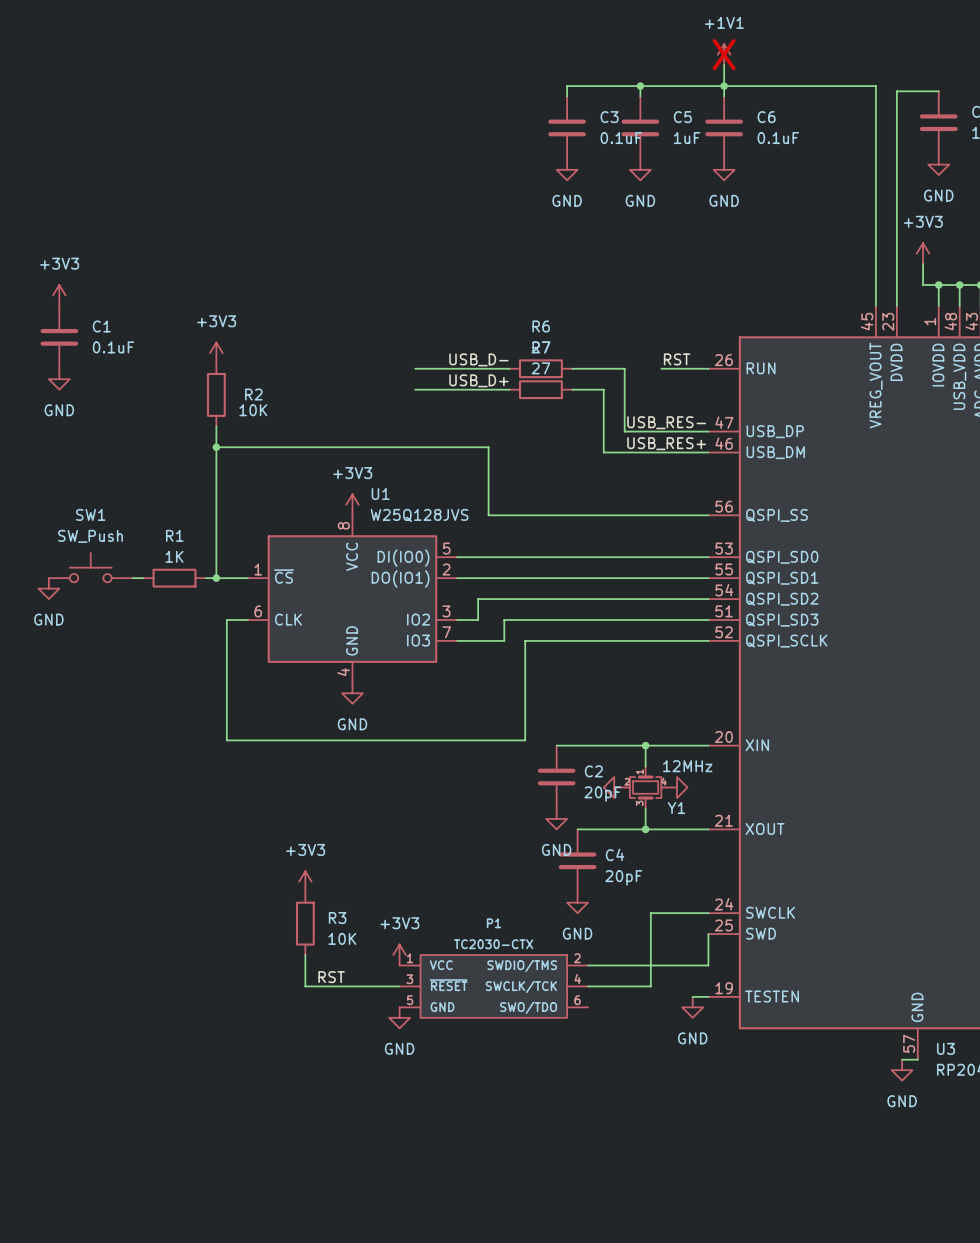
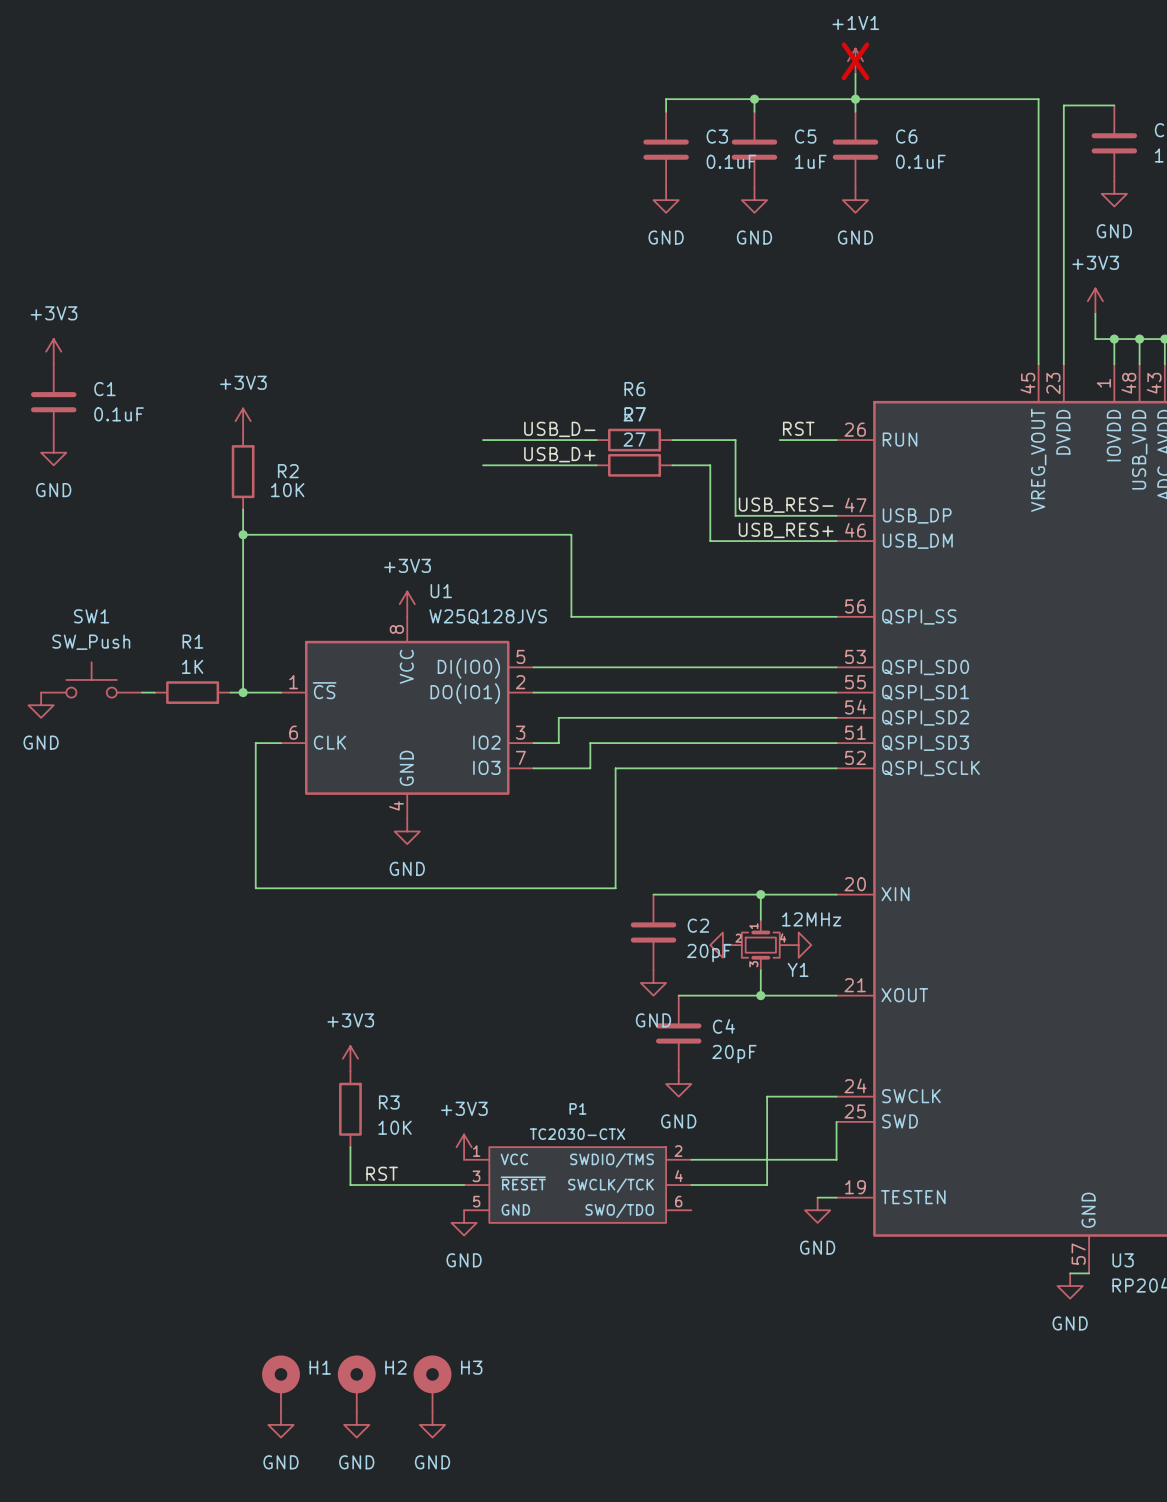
H1: none -> (281, 1383)
H2: none -> (356, 1383)
H3: none -> (432, 1383)
power symbol: none -> GND (281, 1424)
power symbol: none -> GND (356, 1424)
power symbol: none -> GND (432, 1424)

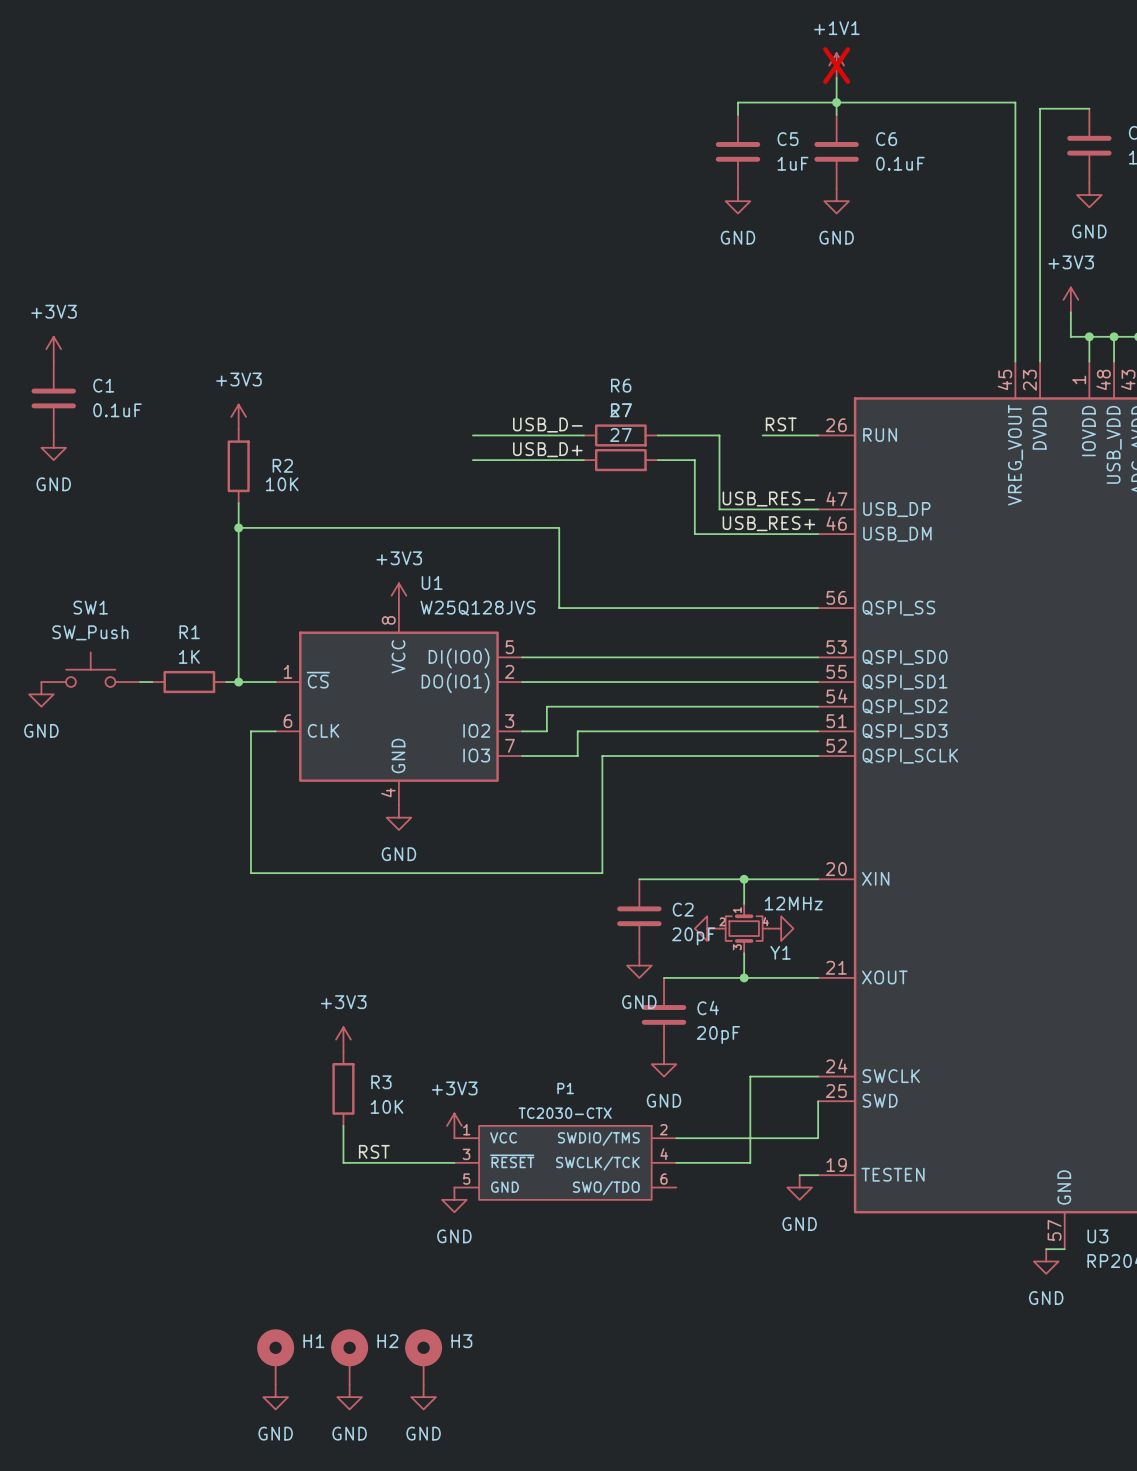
wire: (754, 99) (666, 99) (666, 111) -> none
junction: (754, 99) -> none
C3: 0.1uF (666, 149) -> none
power symbol: GND (666, 200) -> none

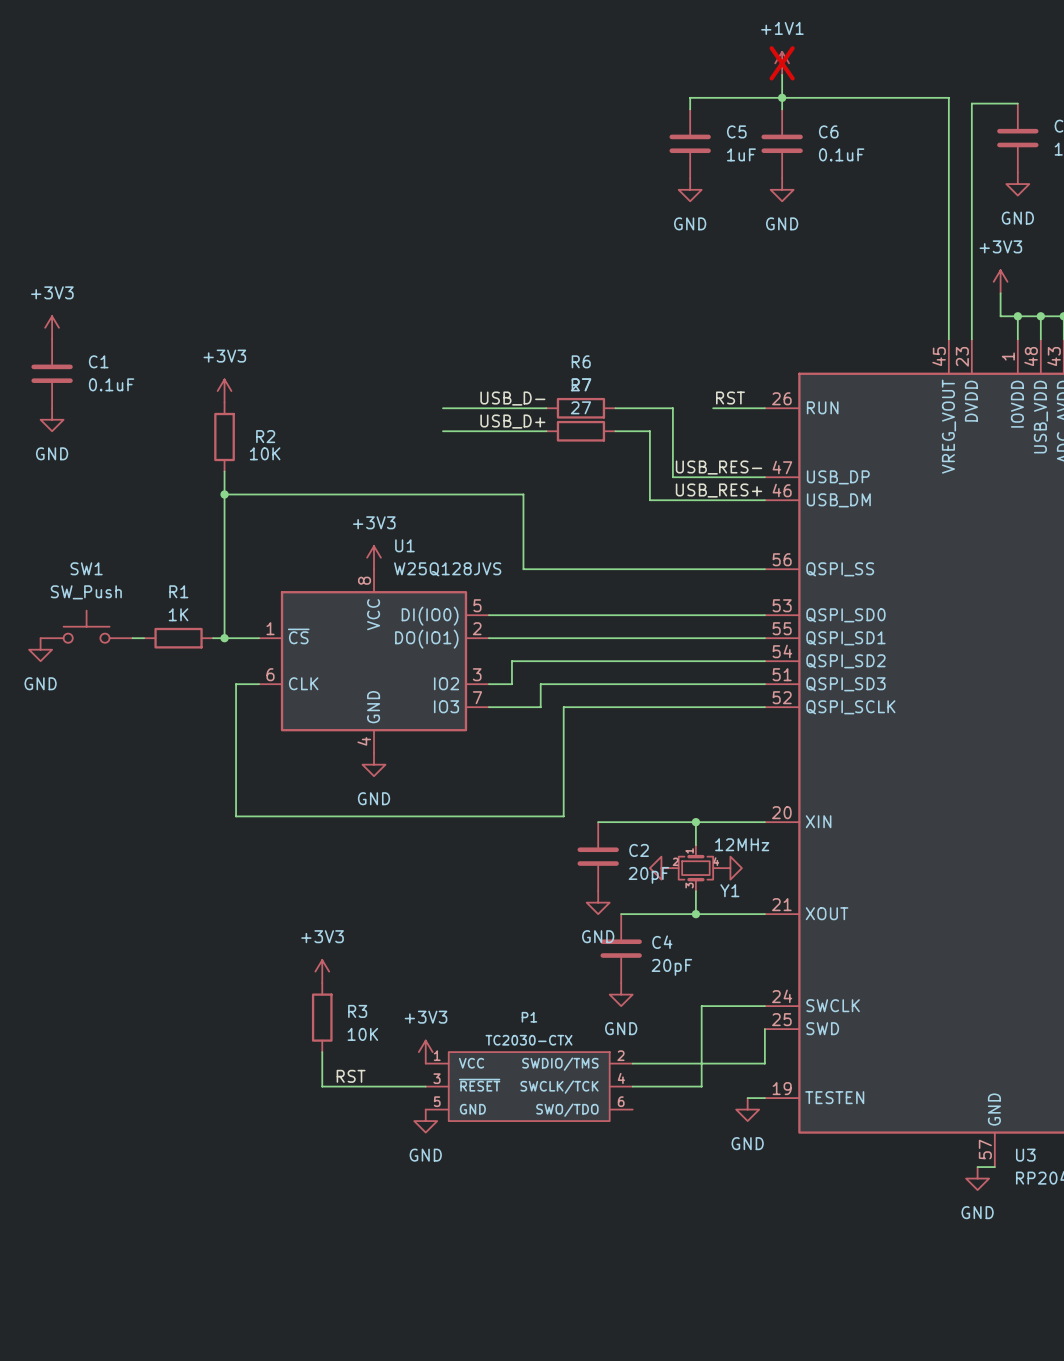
H1: (275, 1357) -> none
H2: (349, 1357) -> none
H3: (423, 1357) -> none
power symbol: GND (275, 1397) -> none
power symbol: GND (349, 1397) -> none
power symbol: GND (423, 1397) -> none

